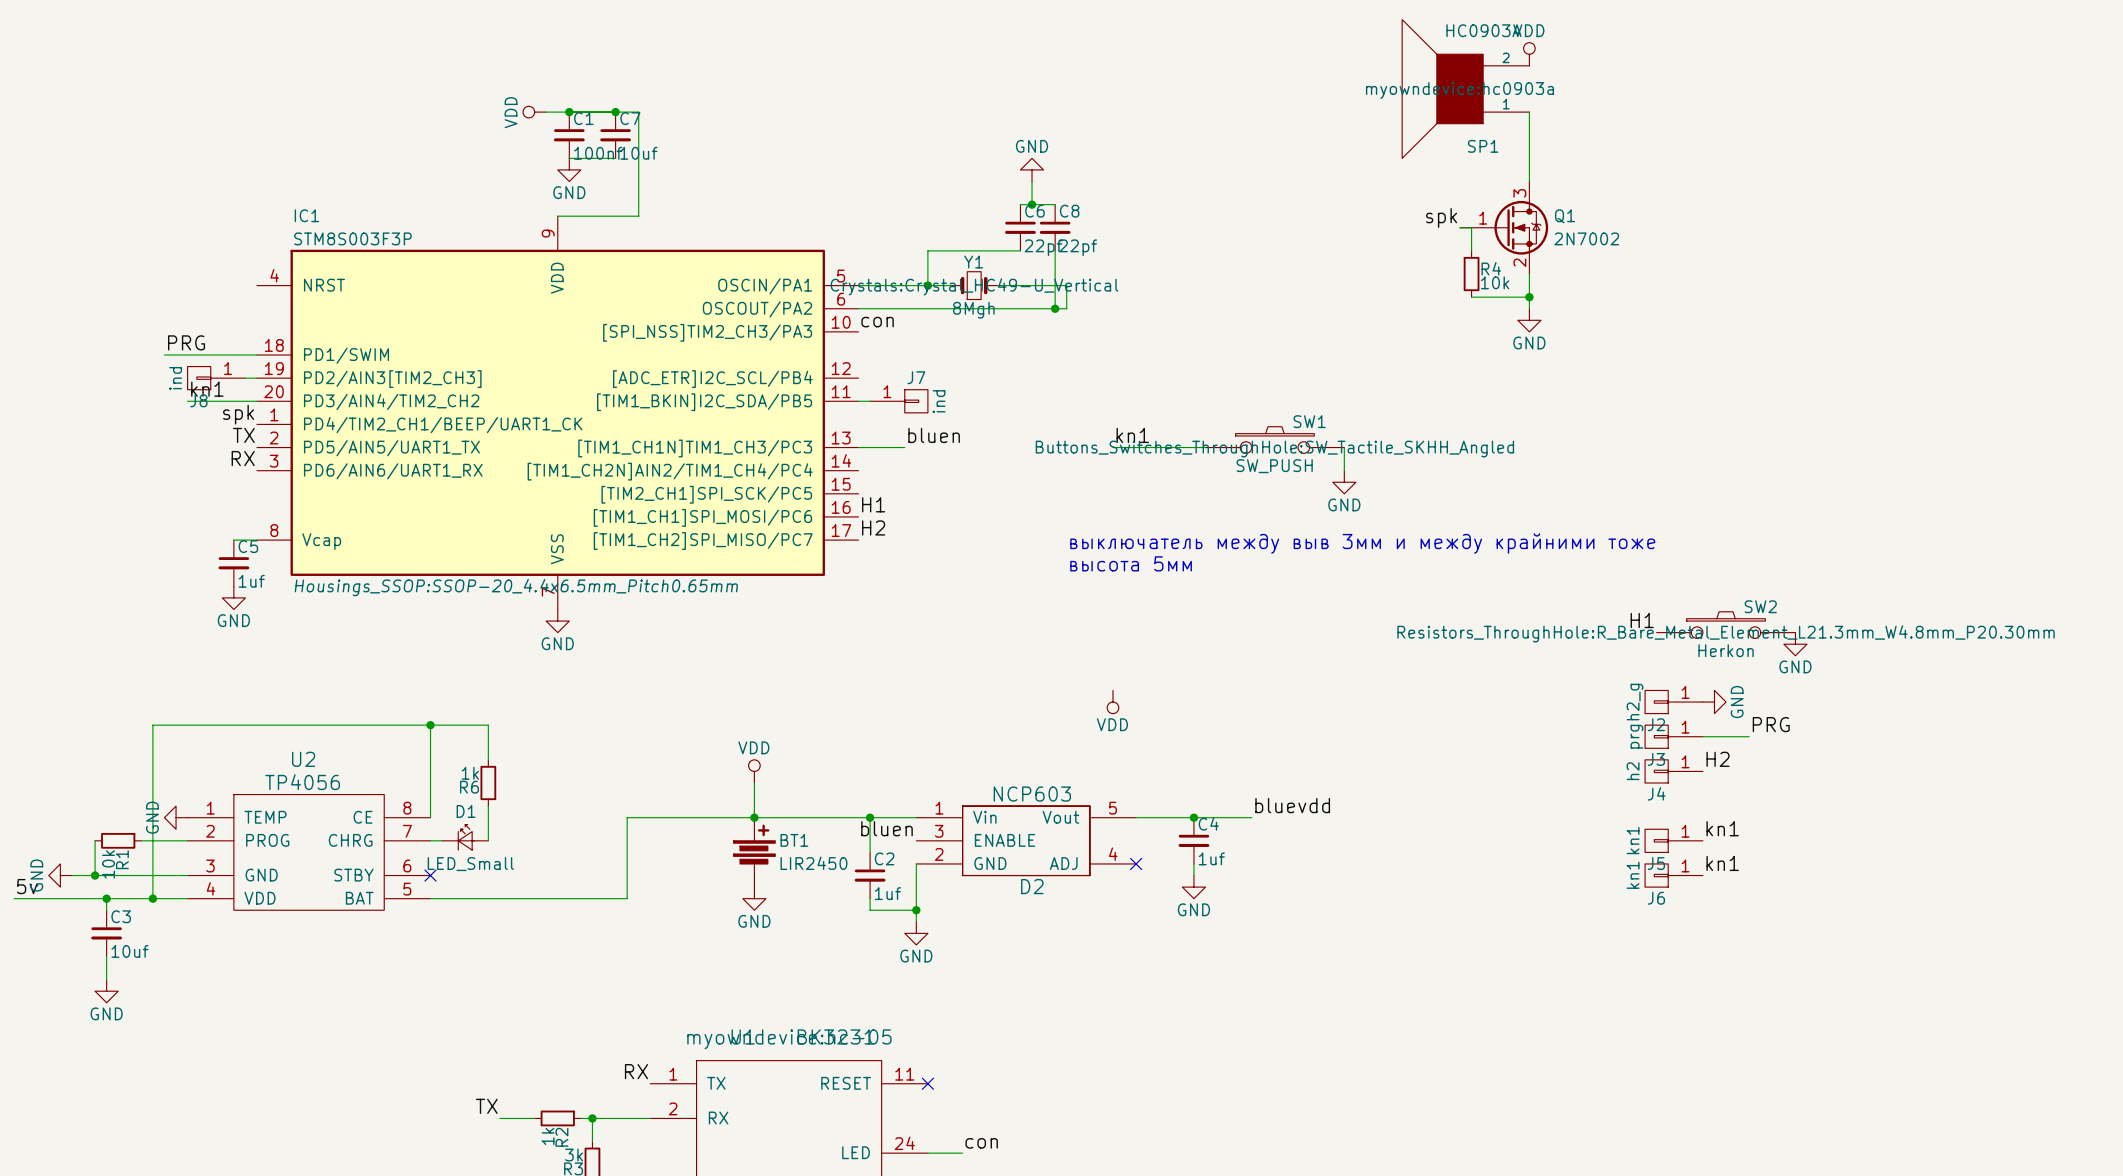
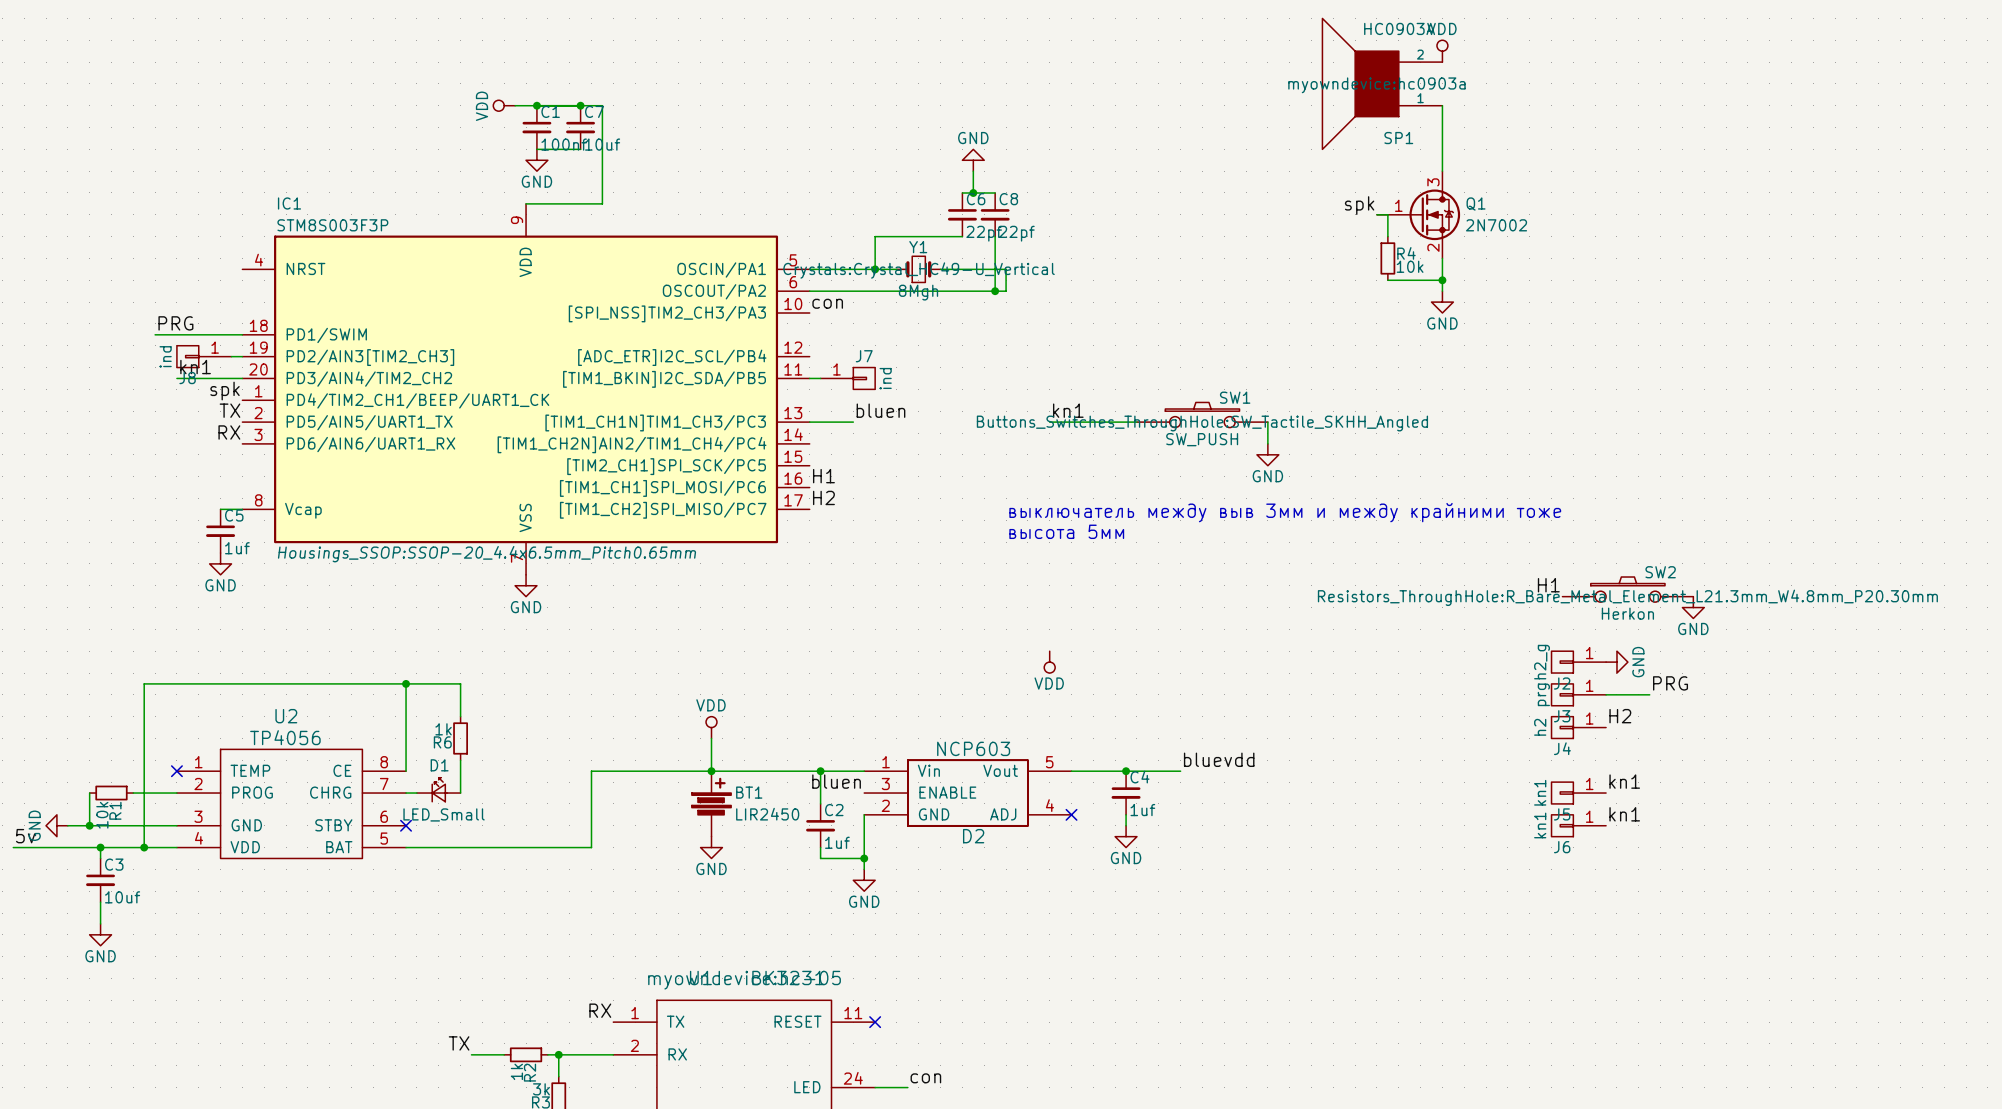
power symbol: GND (176, 817) -> none
no-connect mark: none -> (176, 771)

